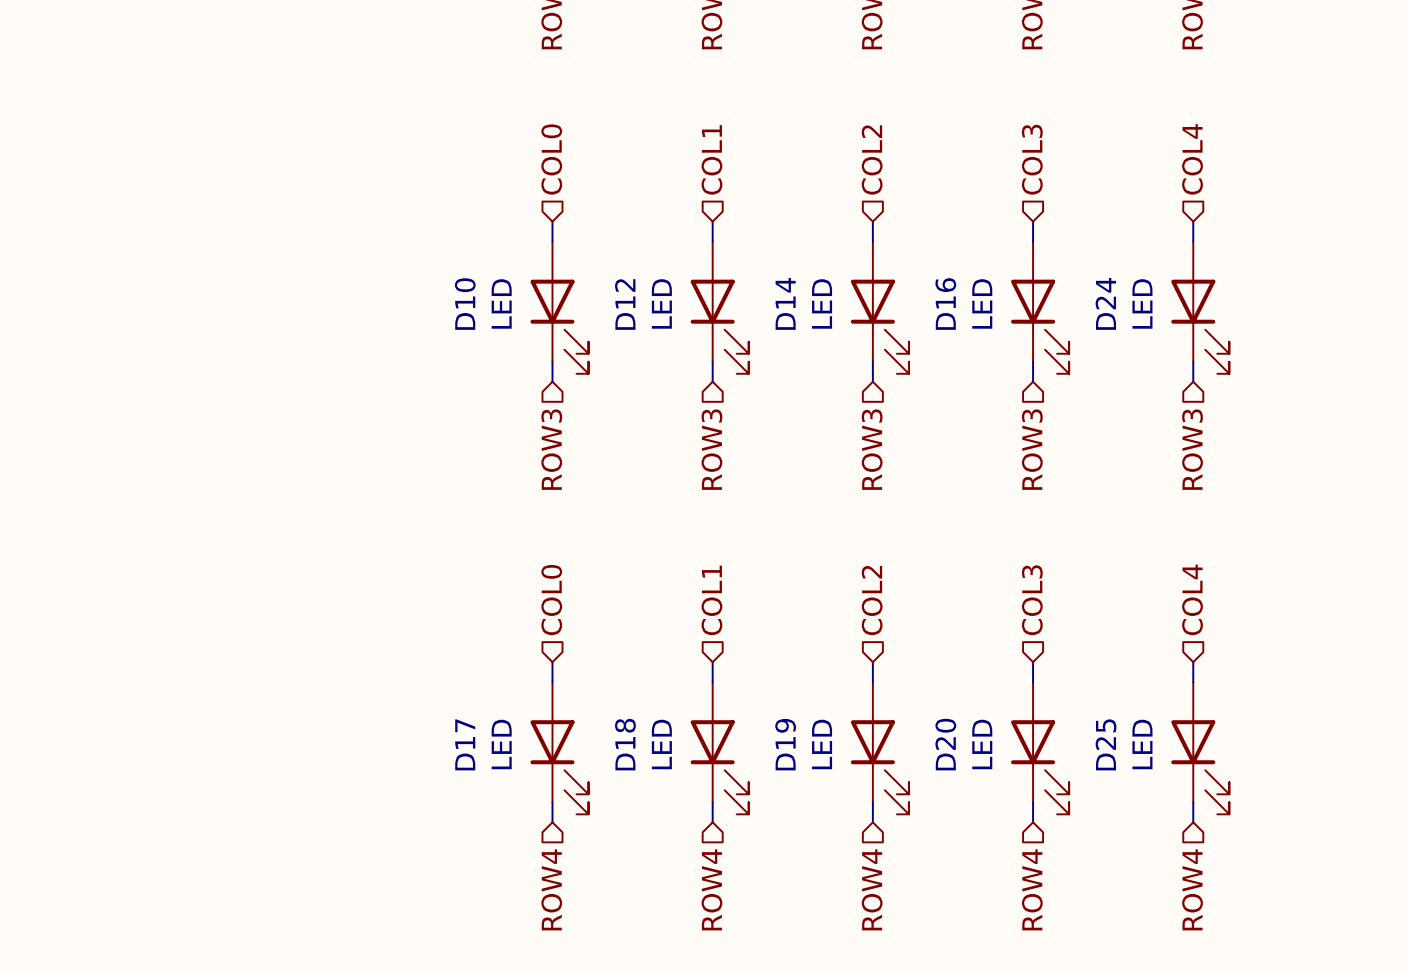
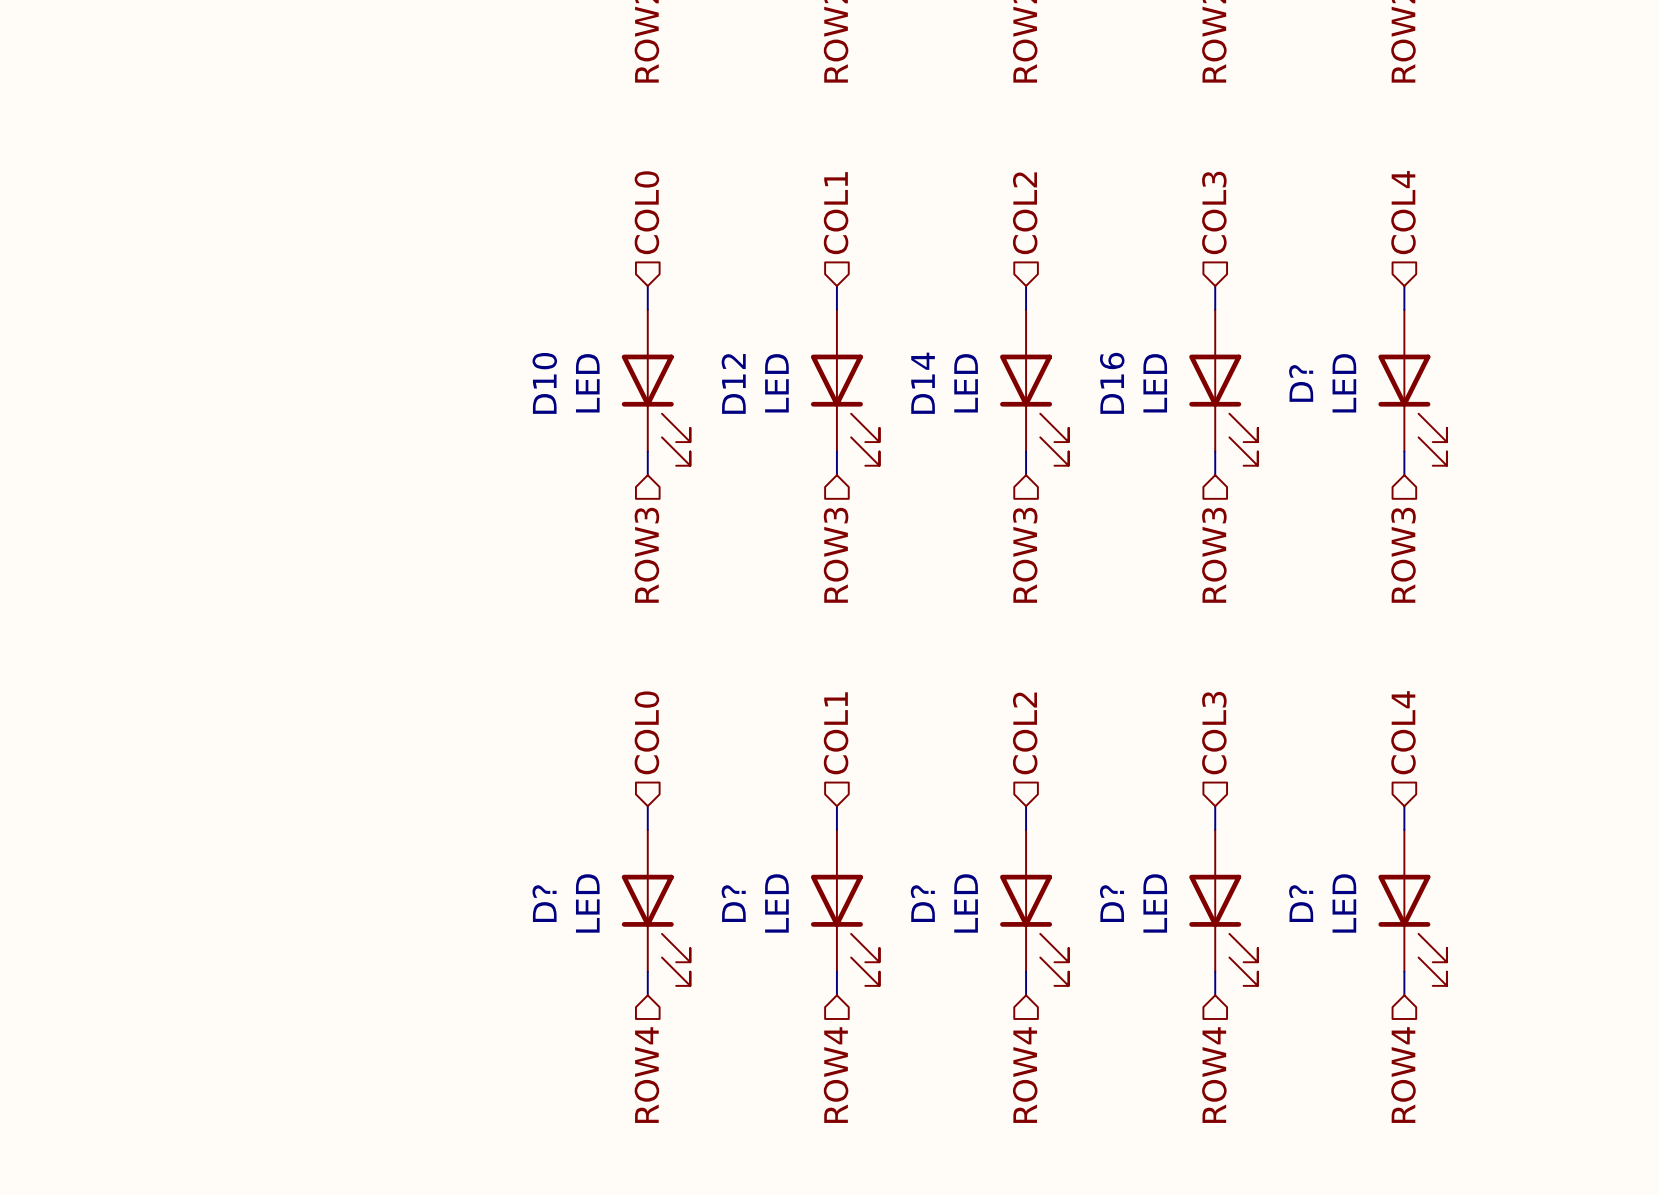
D24 name: D24 (1105, 303) -> D? (1301, 383)
D17 name: D17 (465, 744) -> D? (544, 903)
D18 name: D18 (625, 744) -> D? (733, 903)
D19 name: D19 (785, 744) -> D? (922, 903)
D20 name: D20 (945, 744) -> D? (1111, 903)
D25 name: D25 (1106, 744) -> D? (1301, 903)

